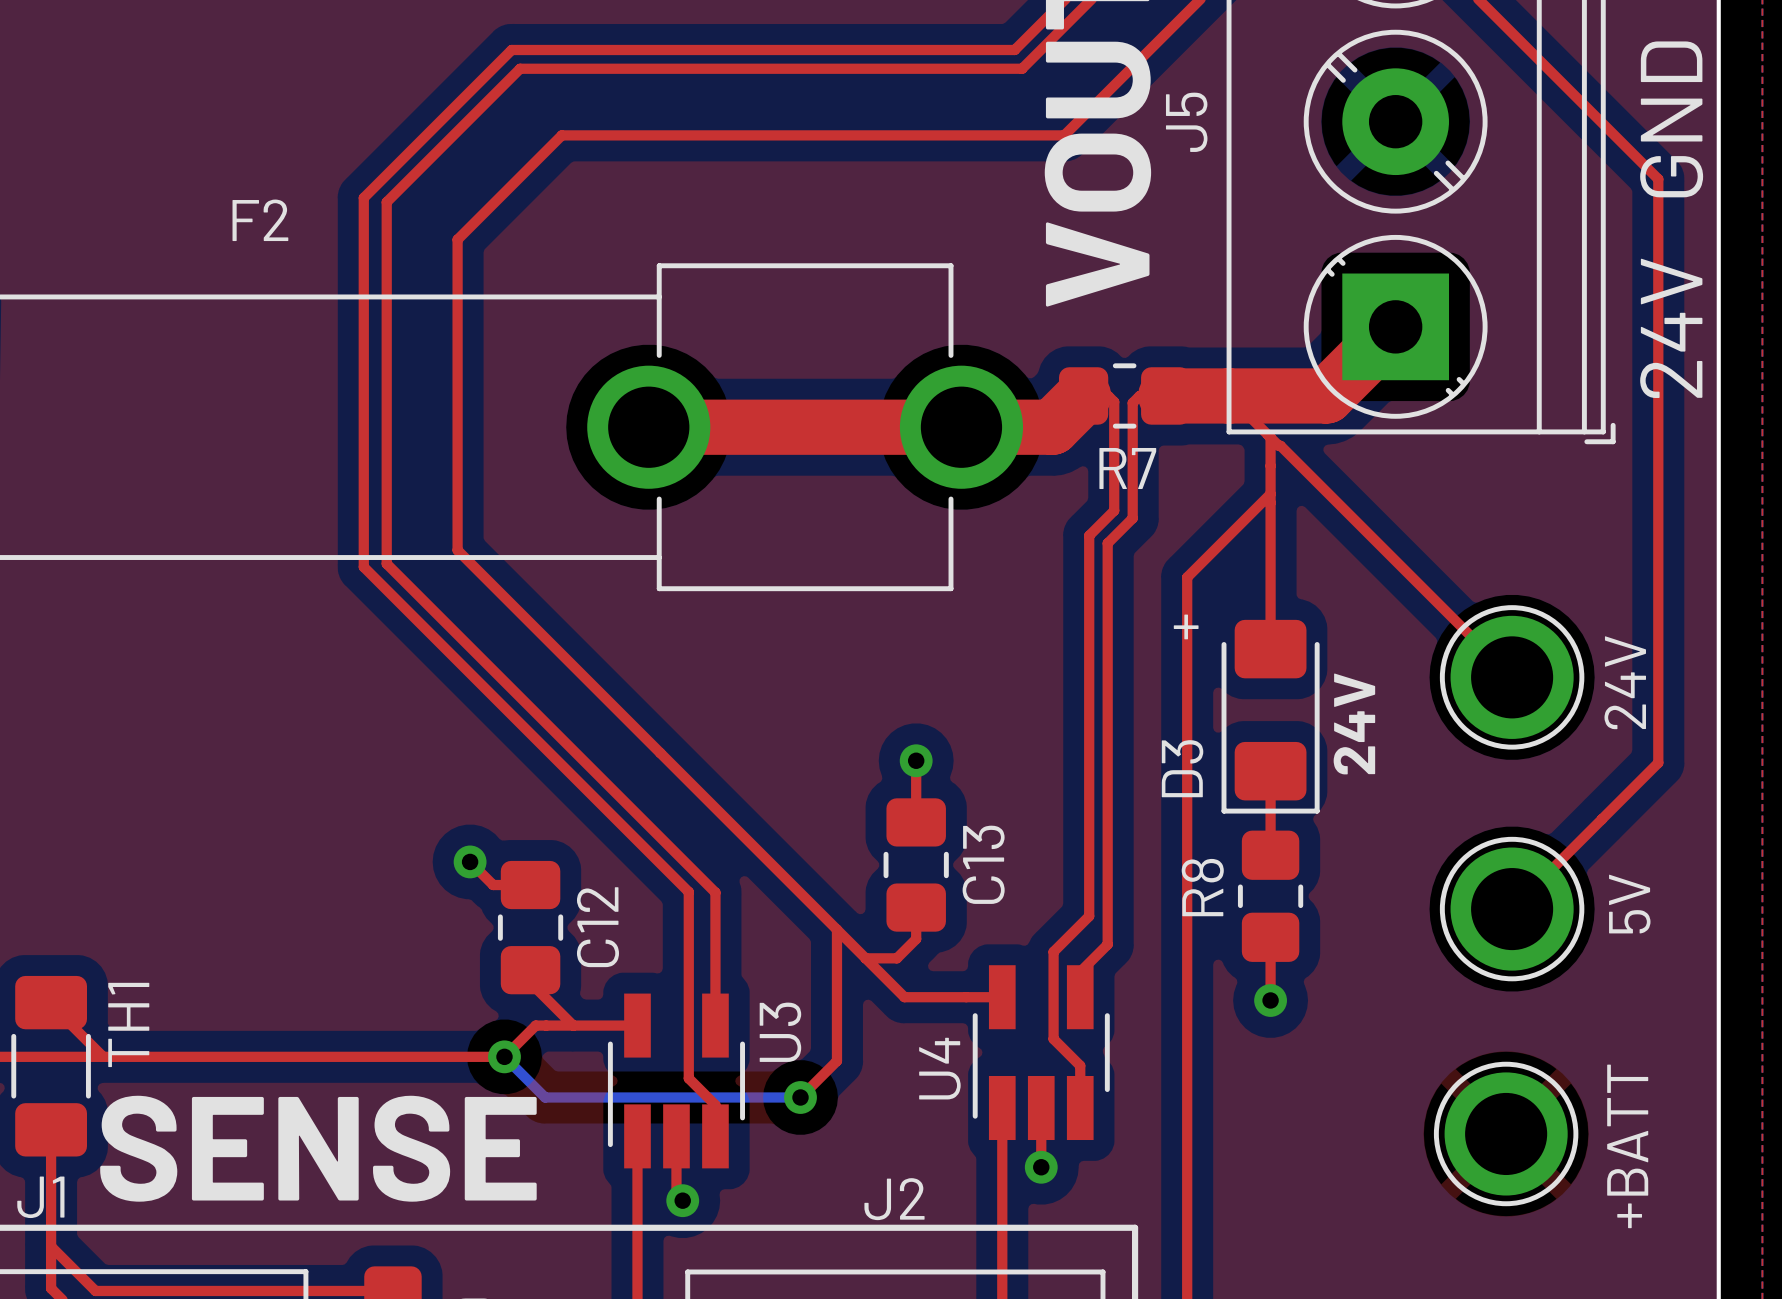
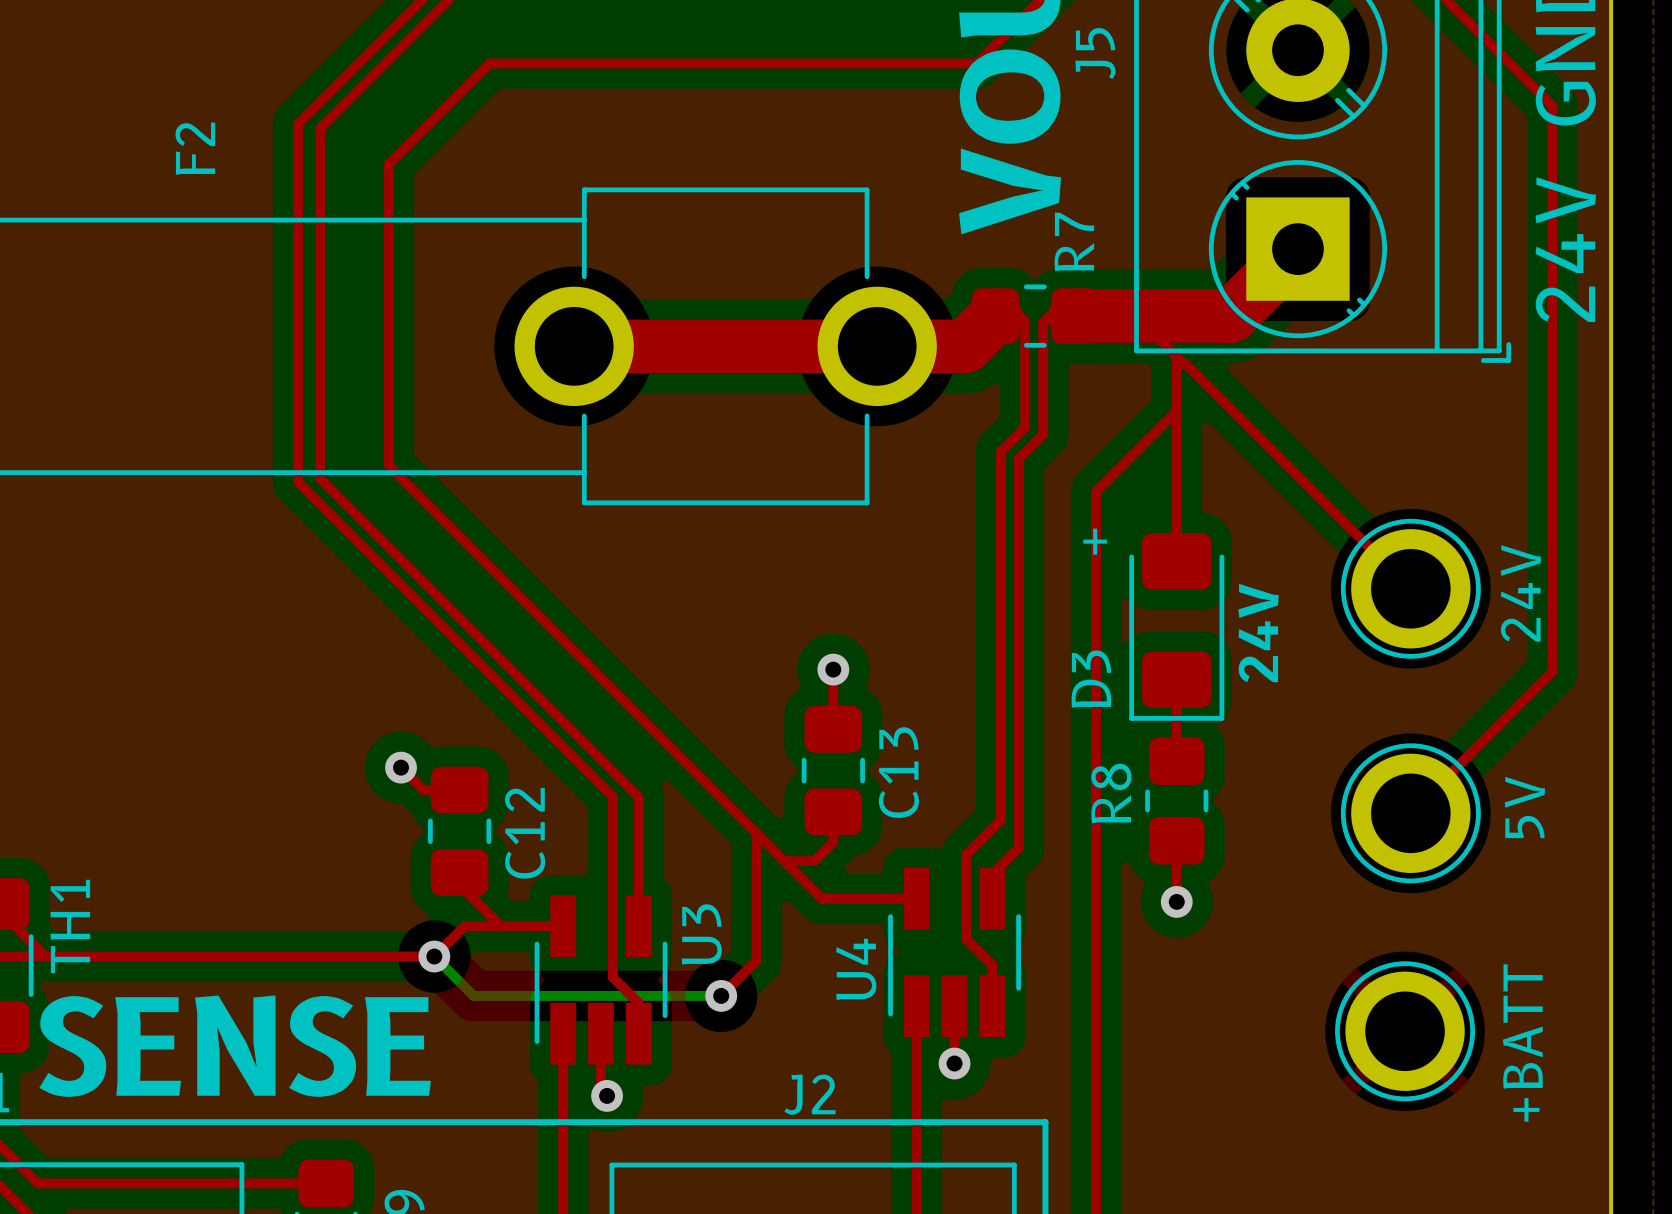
F2 name rotation: 0° (260, 220) -> 90° counterclockwise (195, 148)
R7 name rotation: 0° (1127, 468) -> 90° counterclockwise (1074, 241)
R7 name position: R7 (1127, 468) -> R7 (1074, 241)

